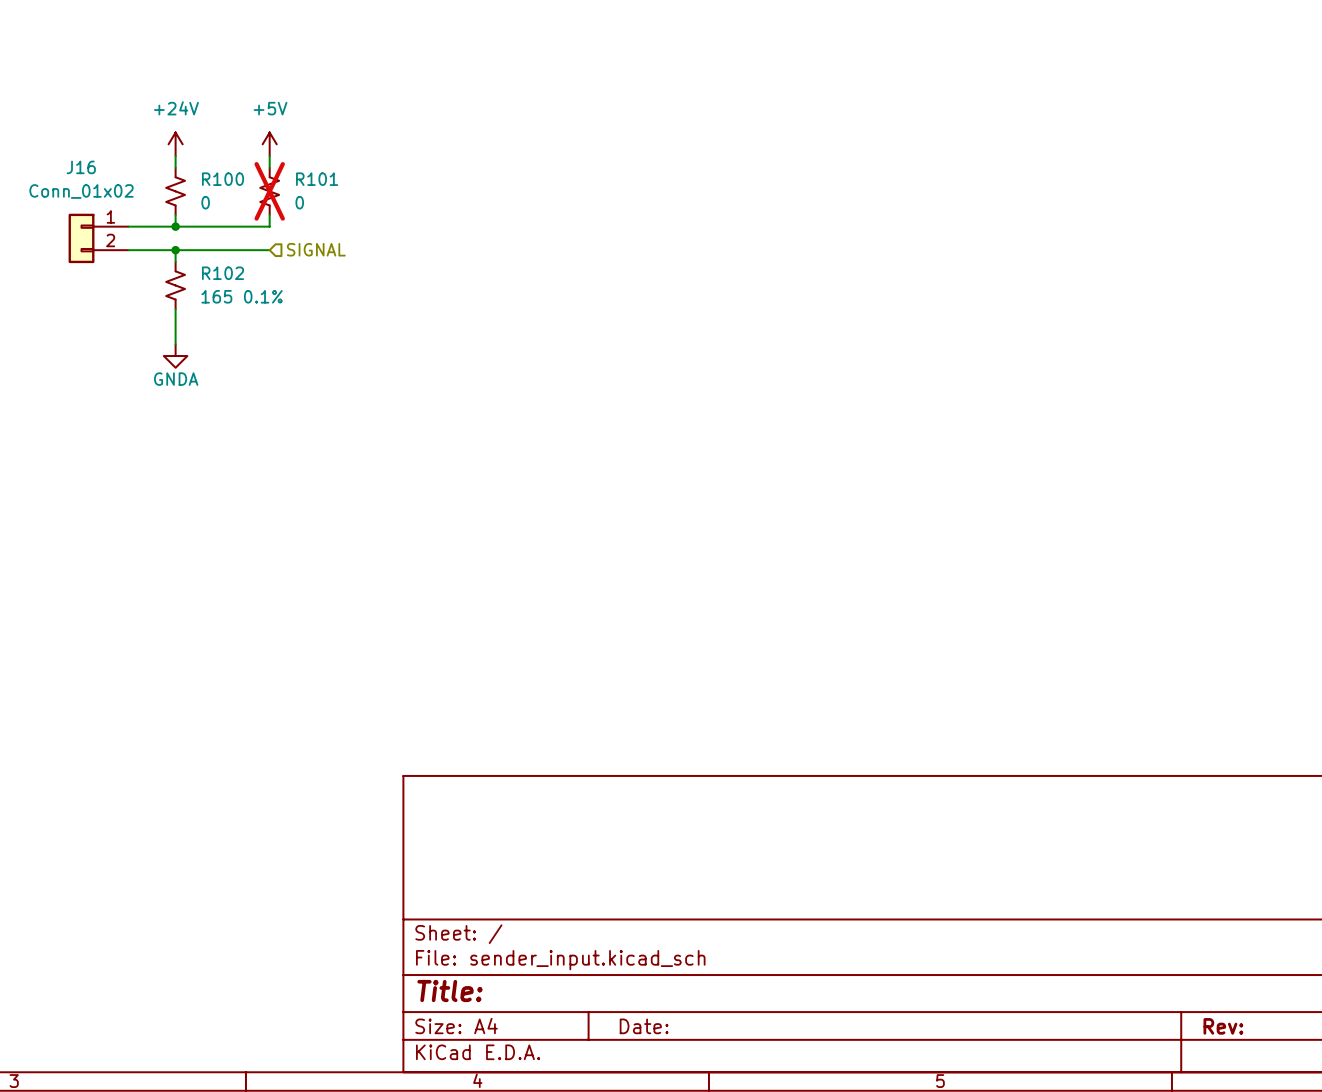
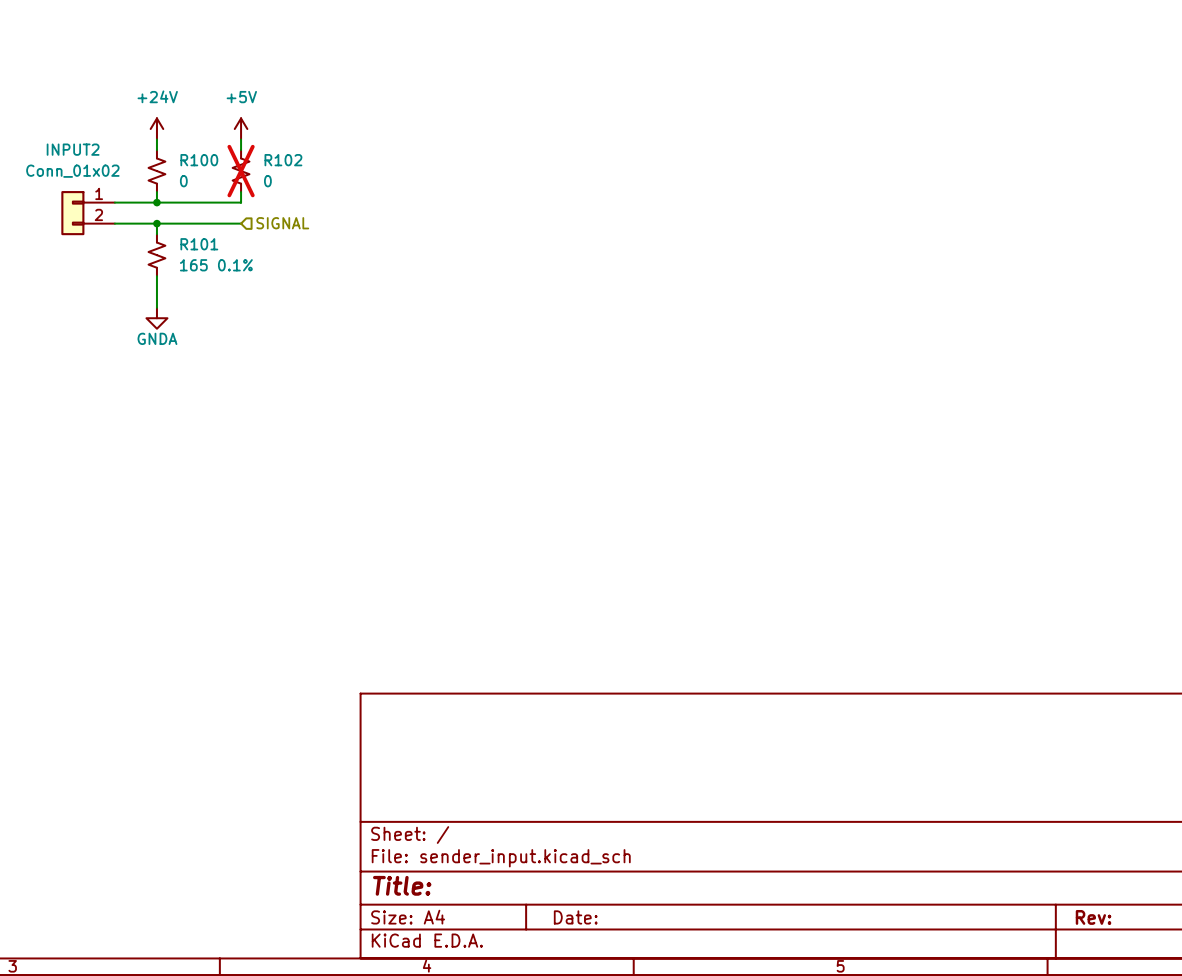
J16 name: J16 (81, 167) -> INPUT2 (73, 149)
R101 name: R101 (317, 179) -> R102 (283, 160)
R102 name: R102 (223, 273) -> R101 (199, 244)

